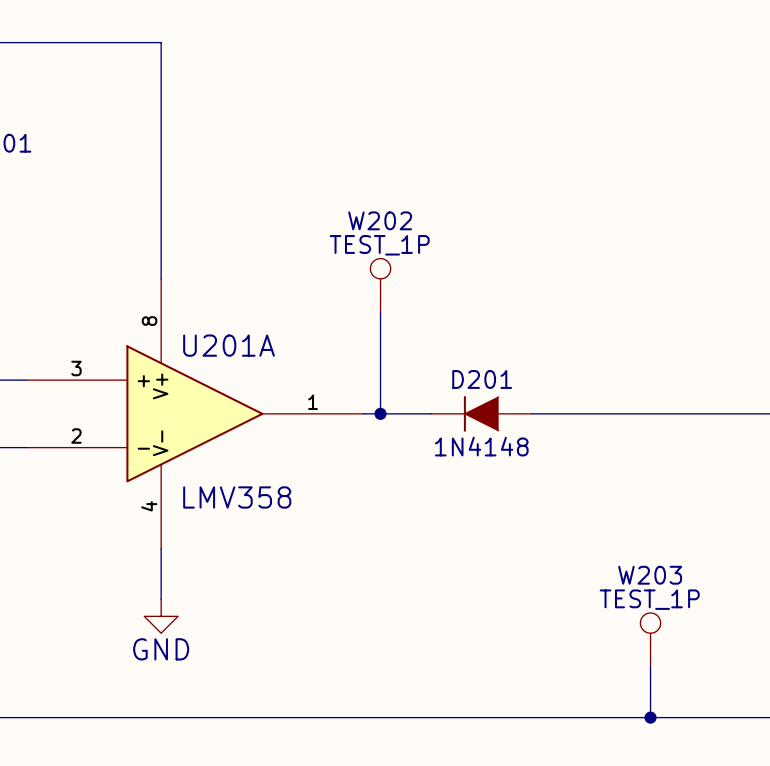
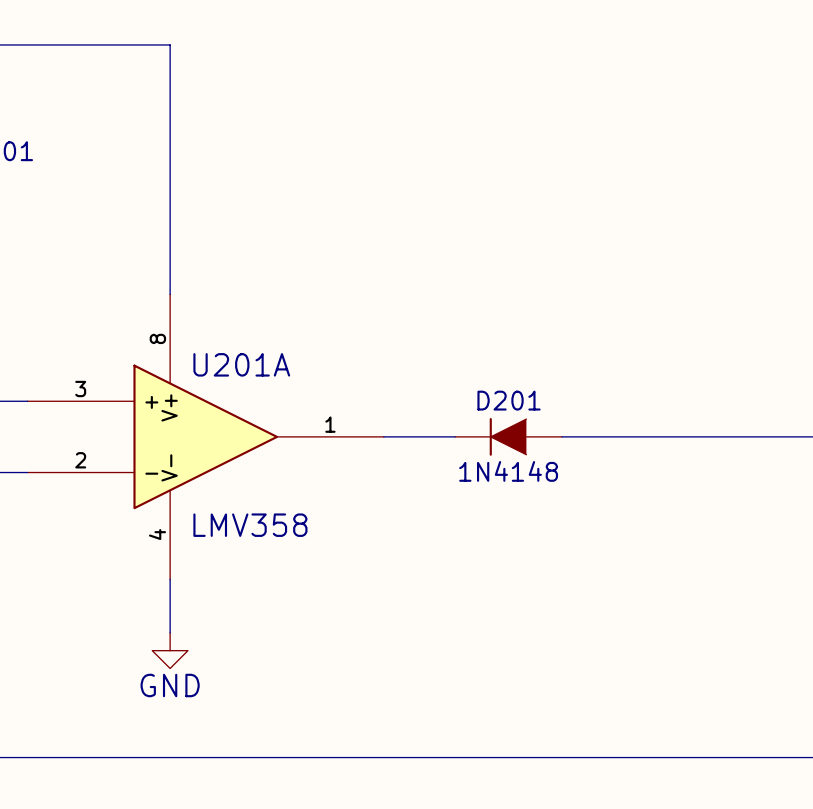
W202: TEST_1P (380, 285) -> none
wire: (380, 312) (380, 413) -> none
junction: (380, 413) -> none
W203: TEST_1P (650, 639) -> none
wire: (650, 666) (650, 717) -> none
junction: (650, 717) -> none

